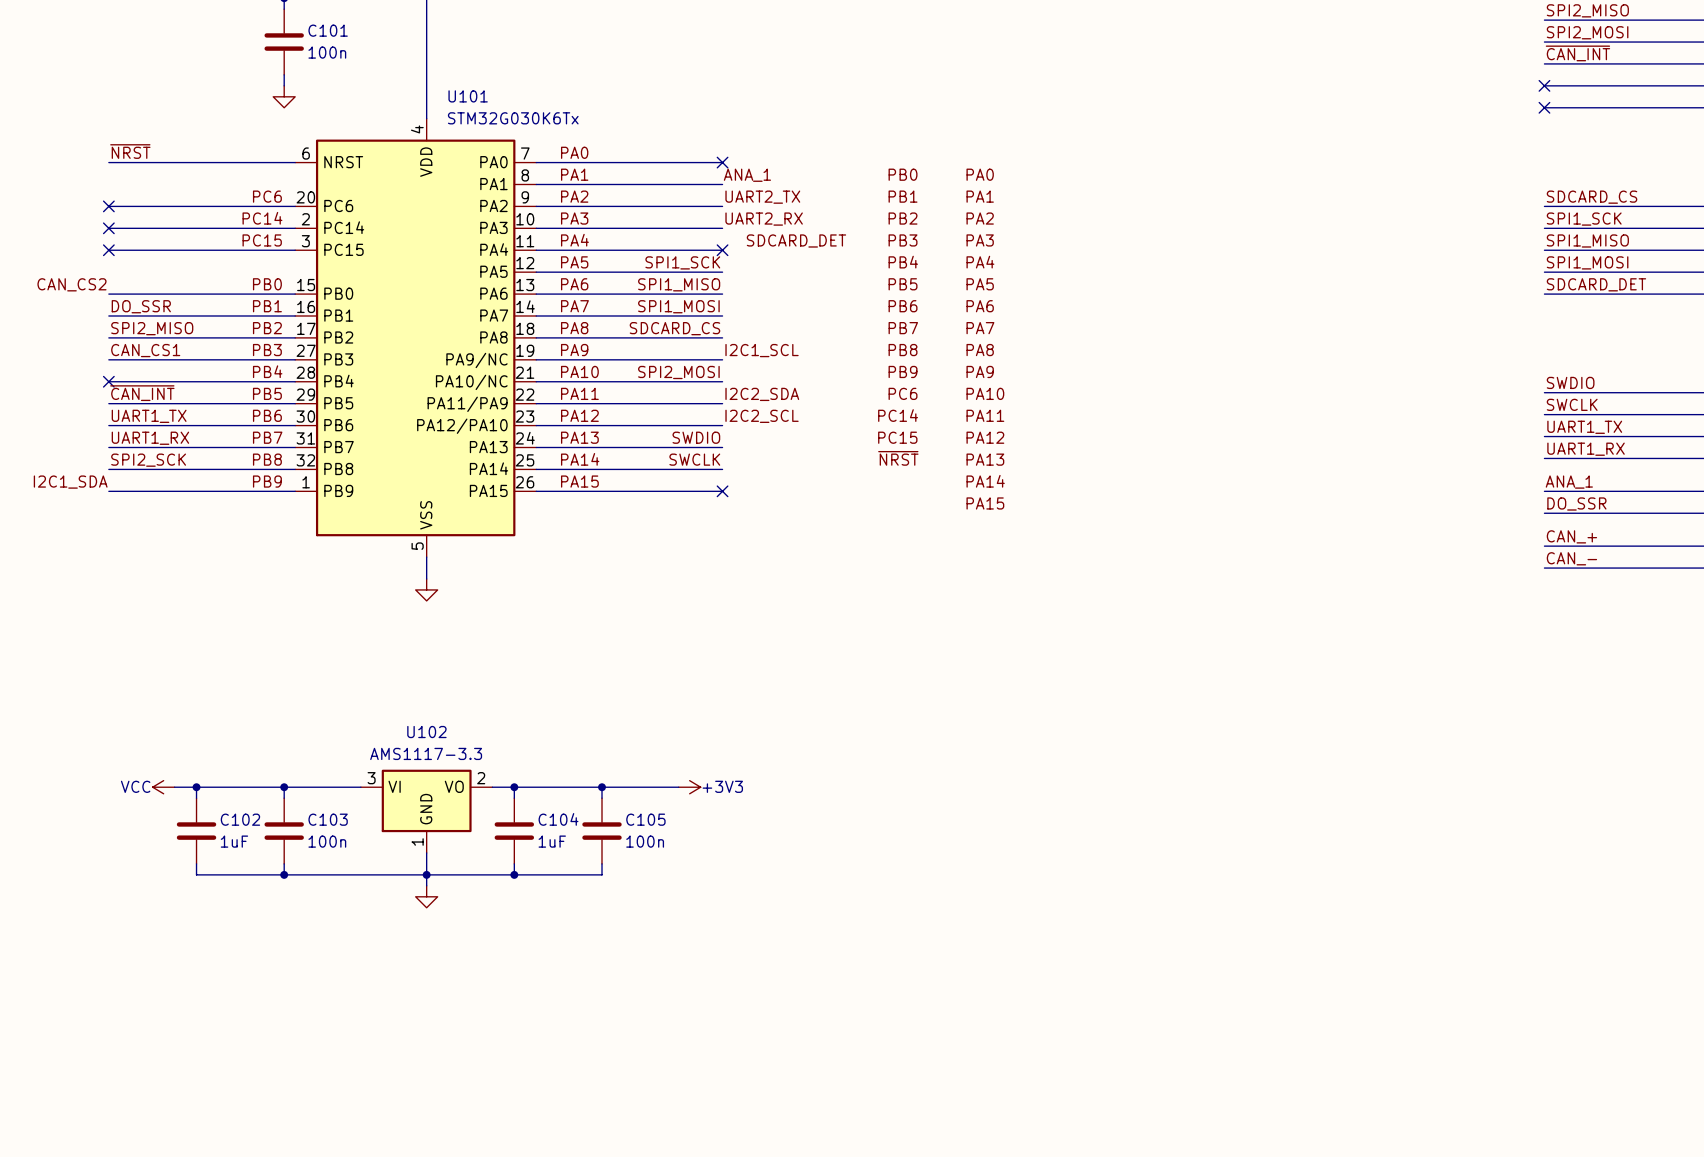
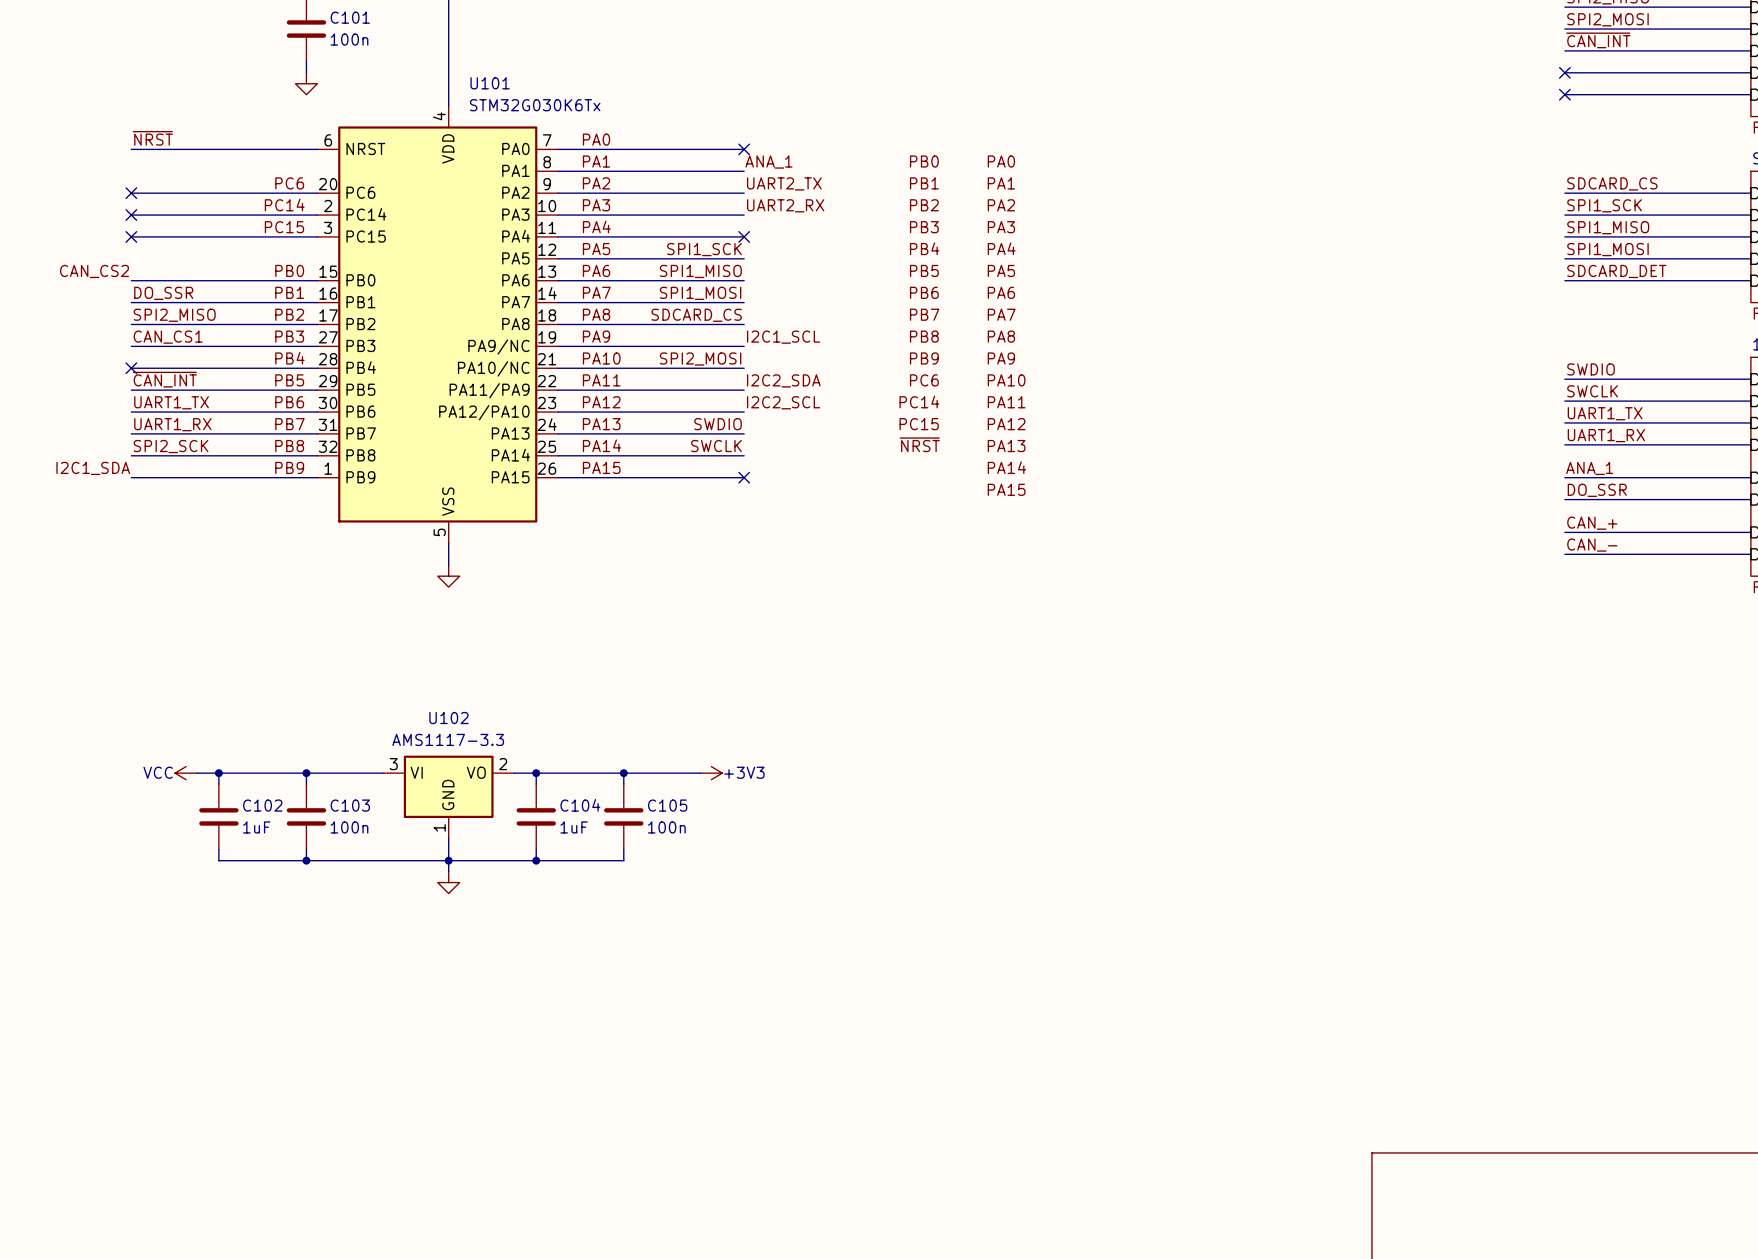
label: SDCARD_DET (796, 240) -> none

